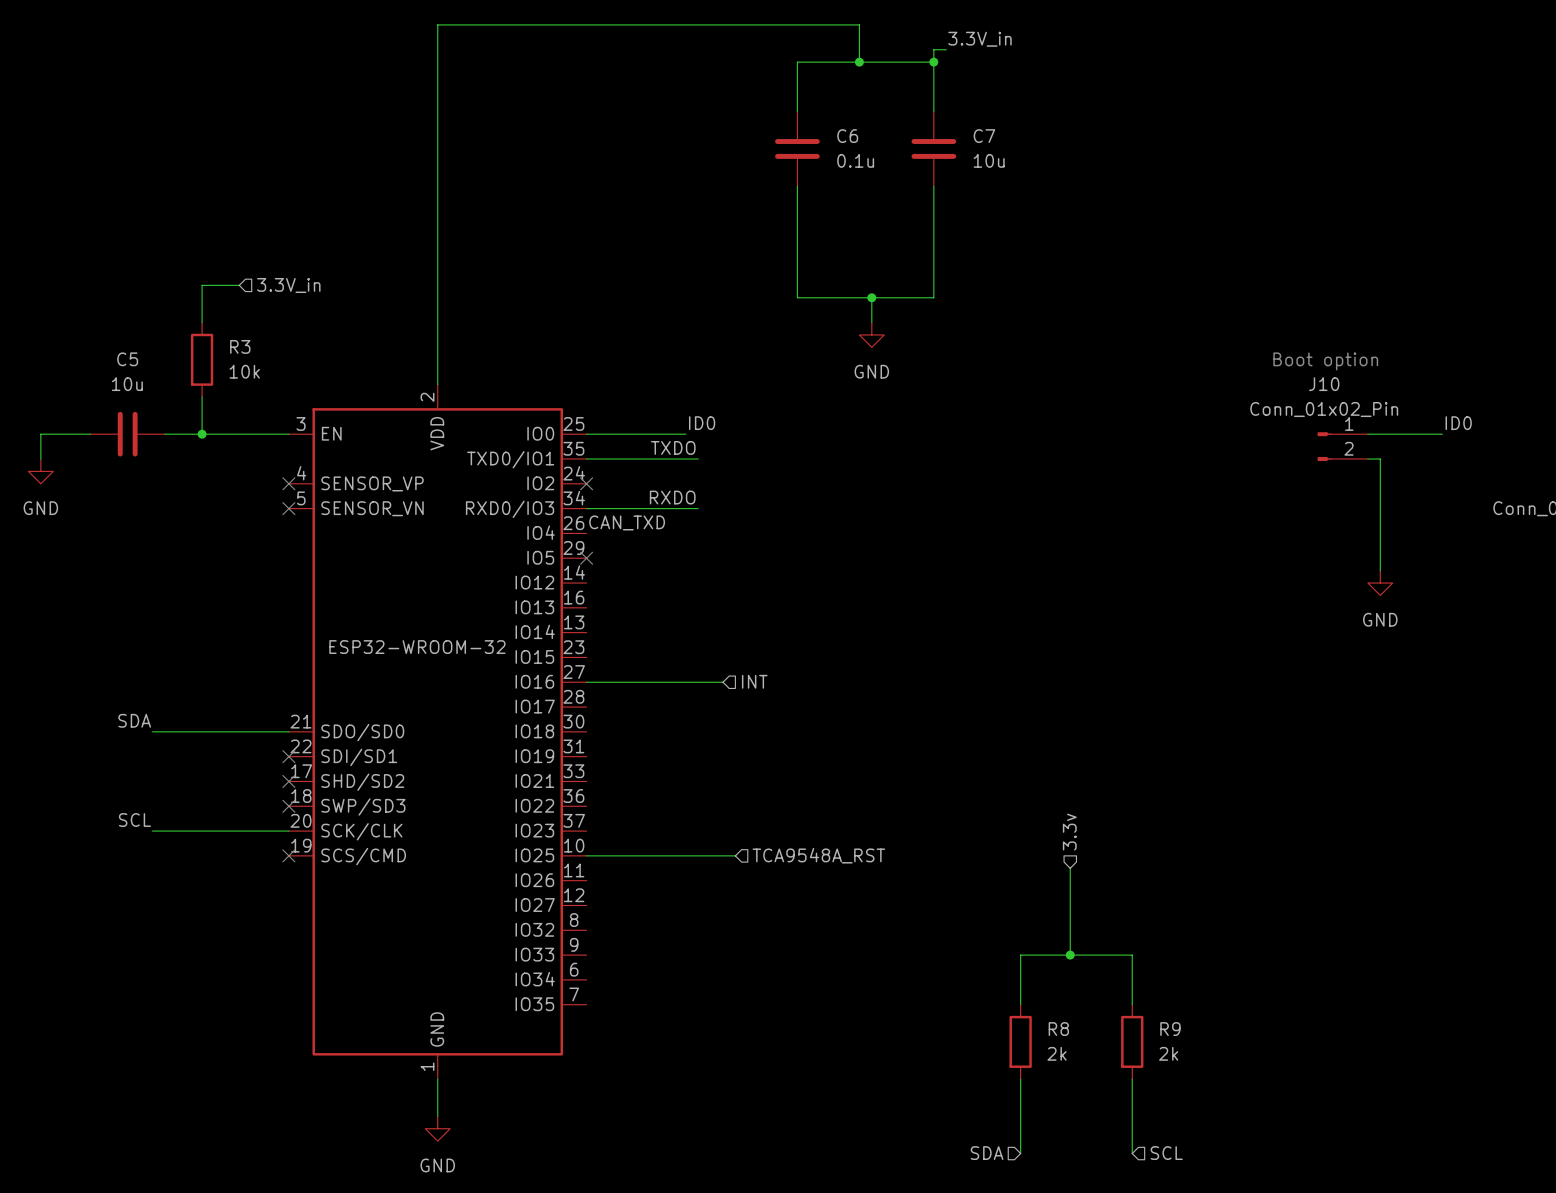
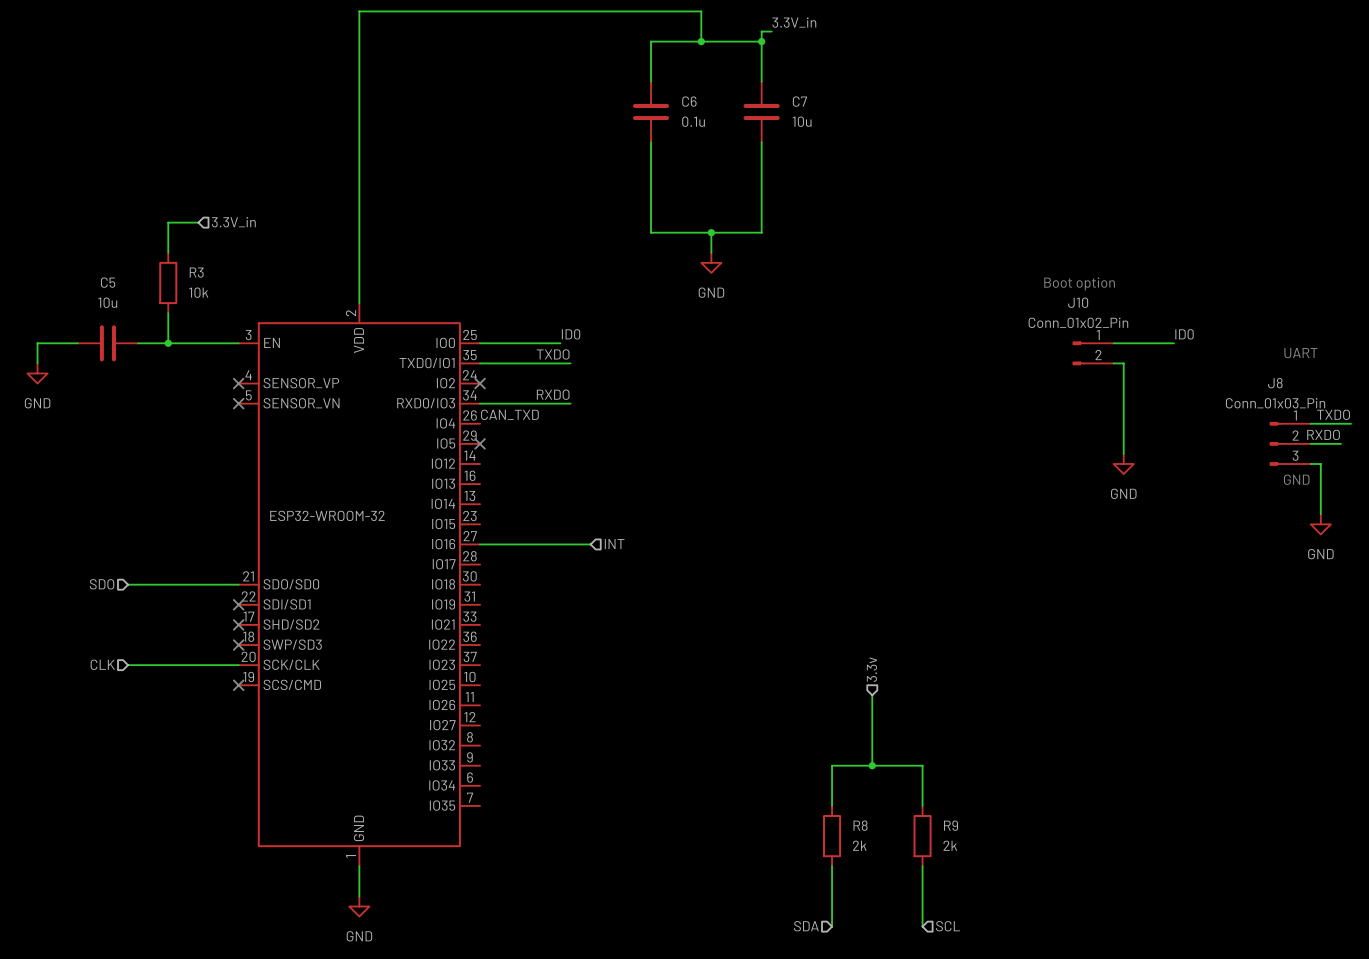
label: SDA (134, 720) -> none
hierarchical label: none -> SDO (102, 584)
label: SCL (134, 820) -> none
hierarchical label: none -> CLK (102, 664)
wire: (586, 855) (735, 855) -> none
hierarchical label: TCA9548A_RST (818, 855) -> none

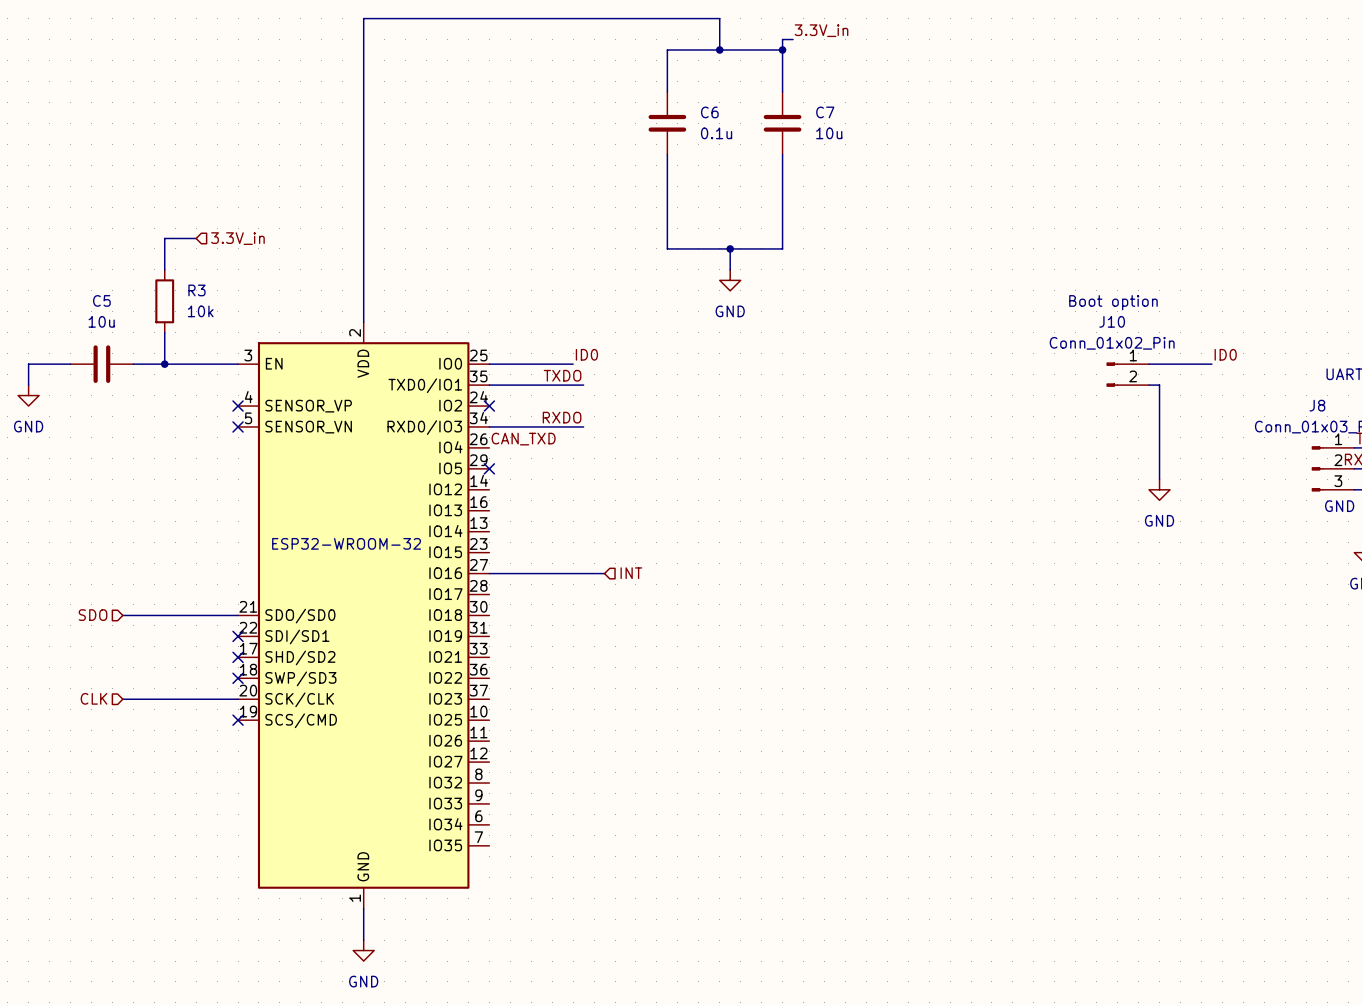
hierarchical label: 3.3v (871, 669) -> none
wire: (872, 695) (872, 765) -> none
junction: (872, 765) -> none
wire: (832, 805) (832, 765) (922, 765) (922, 805) -> none
R8: 2k (832, 836) -> none
R9: 2k (922, 836) -> none
wire: (832, 866) (832, 926) -> none
wire: (922, 866) (922, 926) -> none
hierarchical label: SDA (806, 926) -> none
hierarchical label: SCL (948, 926) -> none

